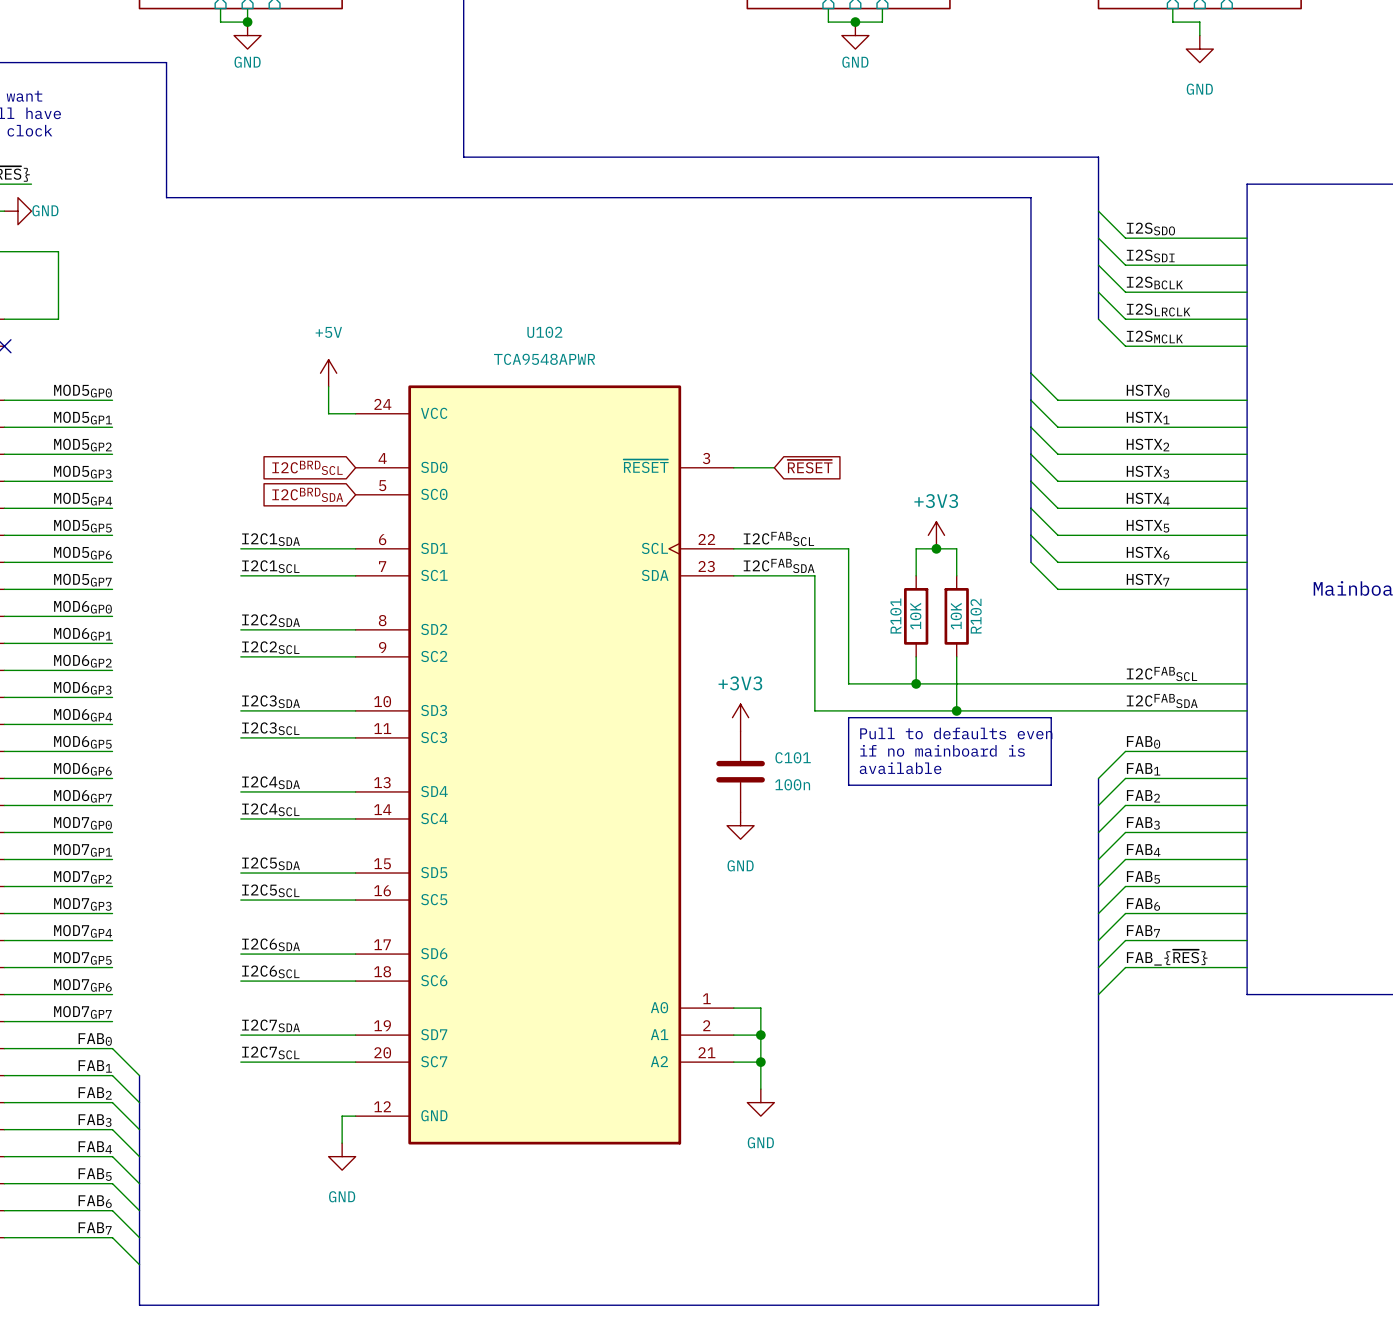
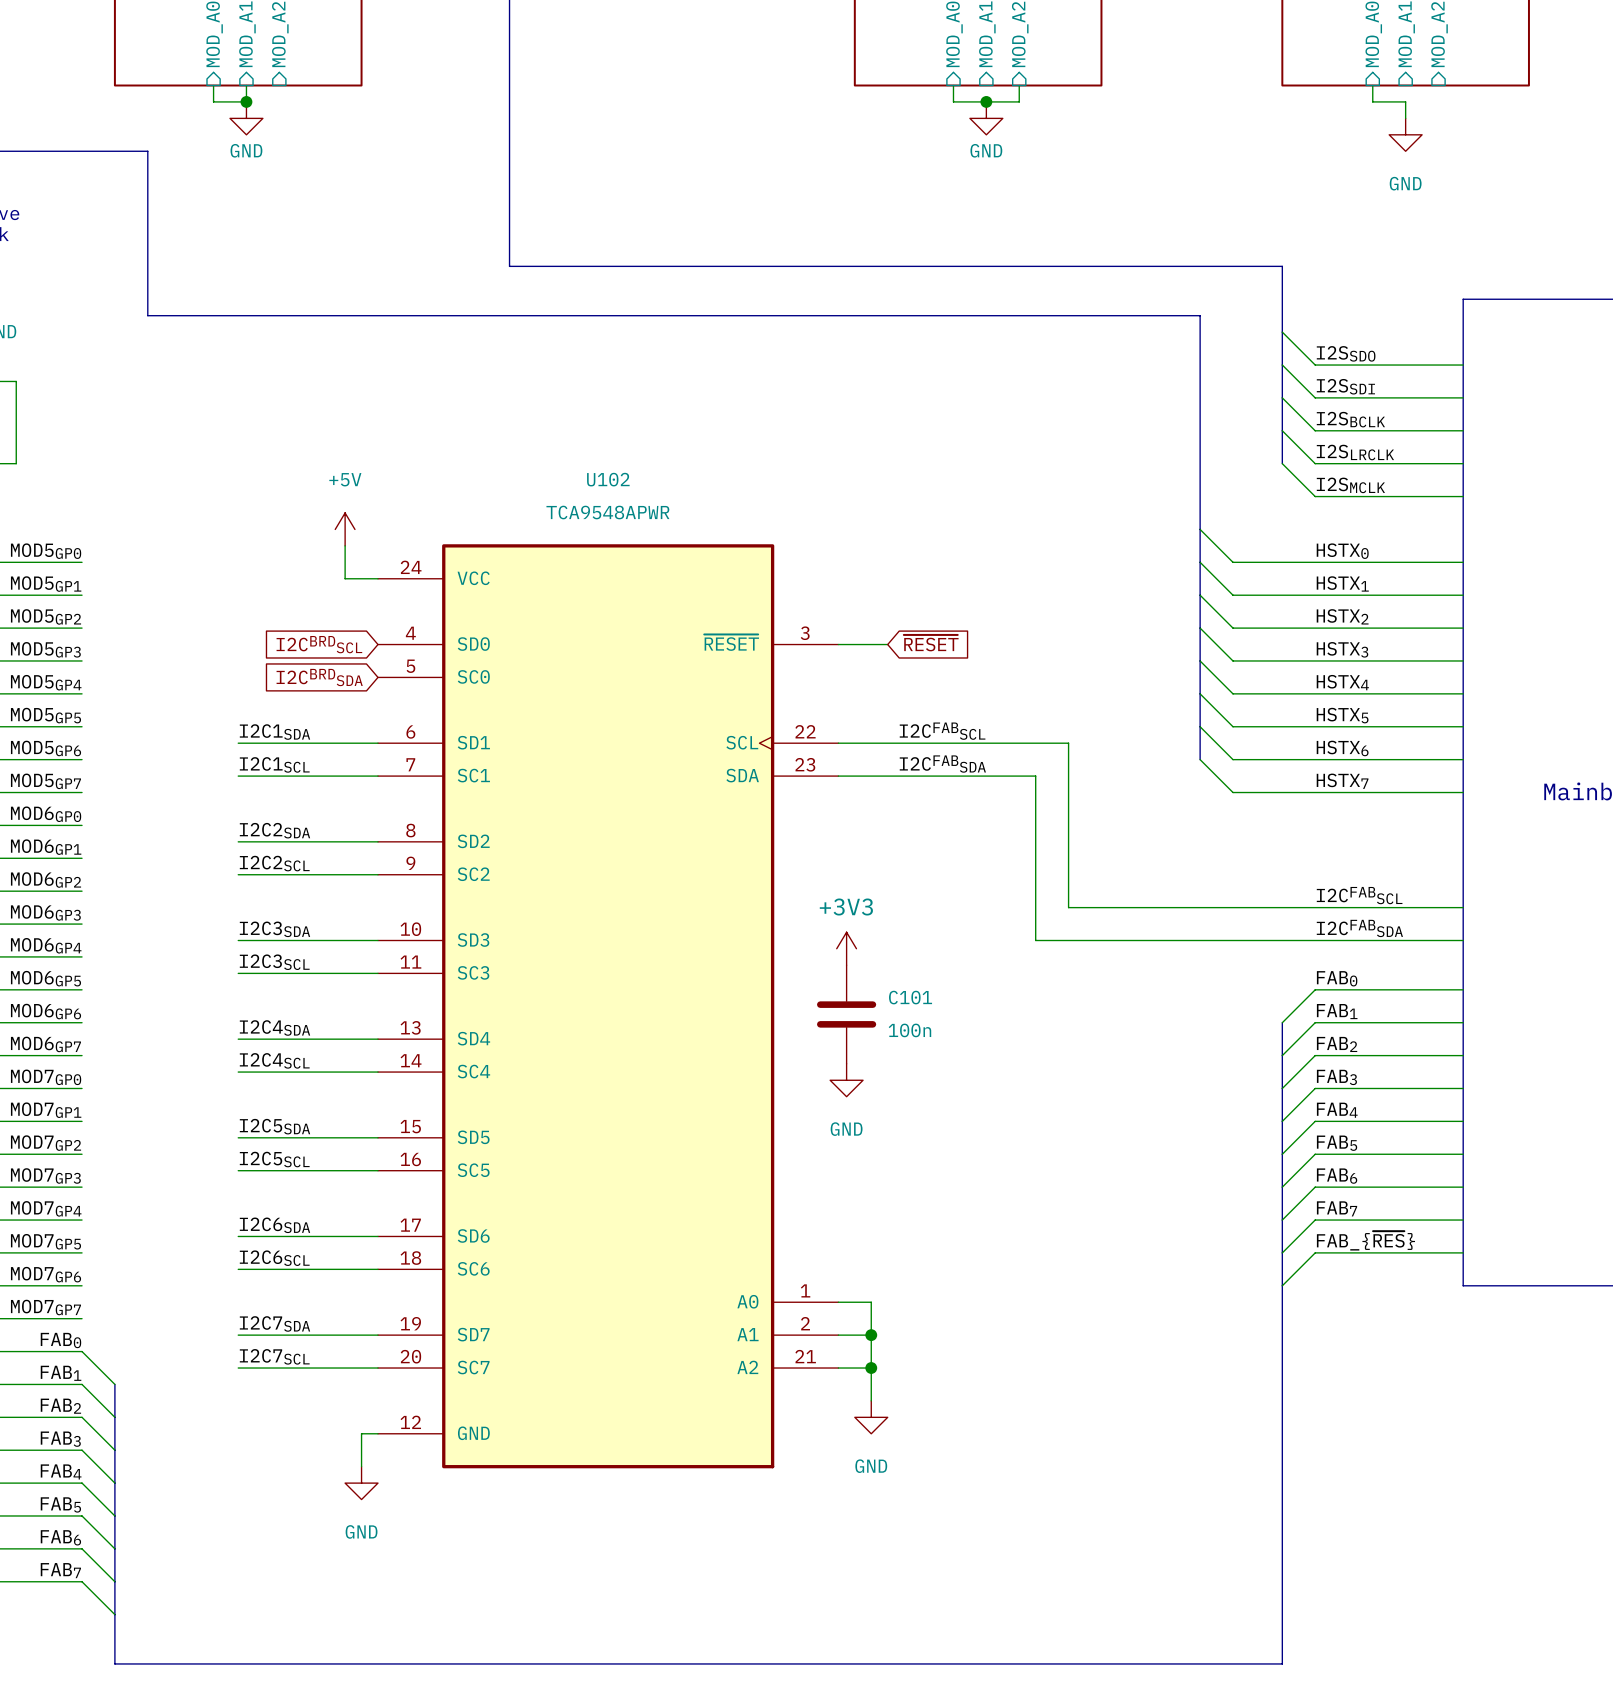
power symbol: +3V3 (936, 535) -> none
label position: I2CFABSCL (778, 538) -> I2CFABSCL (942, 731)
wire: (848, 548) (848, 683) (922, 683) -> (1068, 743) (1068, 907)
wire: (916, 548) (916, 575) -> (1060, 743) (978, 743)
wire: (922, 548) (956, 548) (956, 575) -> none
junction: (936, 548) -> none
label position: I2CFABSDA (779, 565) -> I2CFABSDA (942, 764)
wire: (814, 575) (814, 710) (895, 710) -> (937, 776) (1035, 776) (1035, 940)
R101: 10K (916, 616) -> none
R102: 10K (956, 616) -> none
wire: (916, 656) (916, 683) -> none
wire: (956, 656) (956, 710) -> none
junction: (916, 683) -> none
junction: (956, 710) -> none
line: (848, 717) (1051, 717) (1051, 785) (848, 785) (848, 717) -> none
text: Pull to defaults even (956, 733) -> none
text: if no mainboard is (942, 750) -> none
text: available (900, 768) -> none

